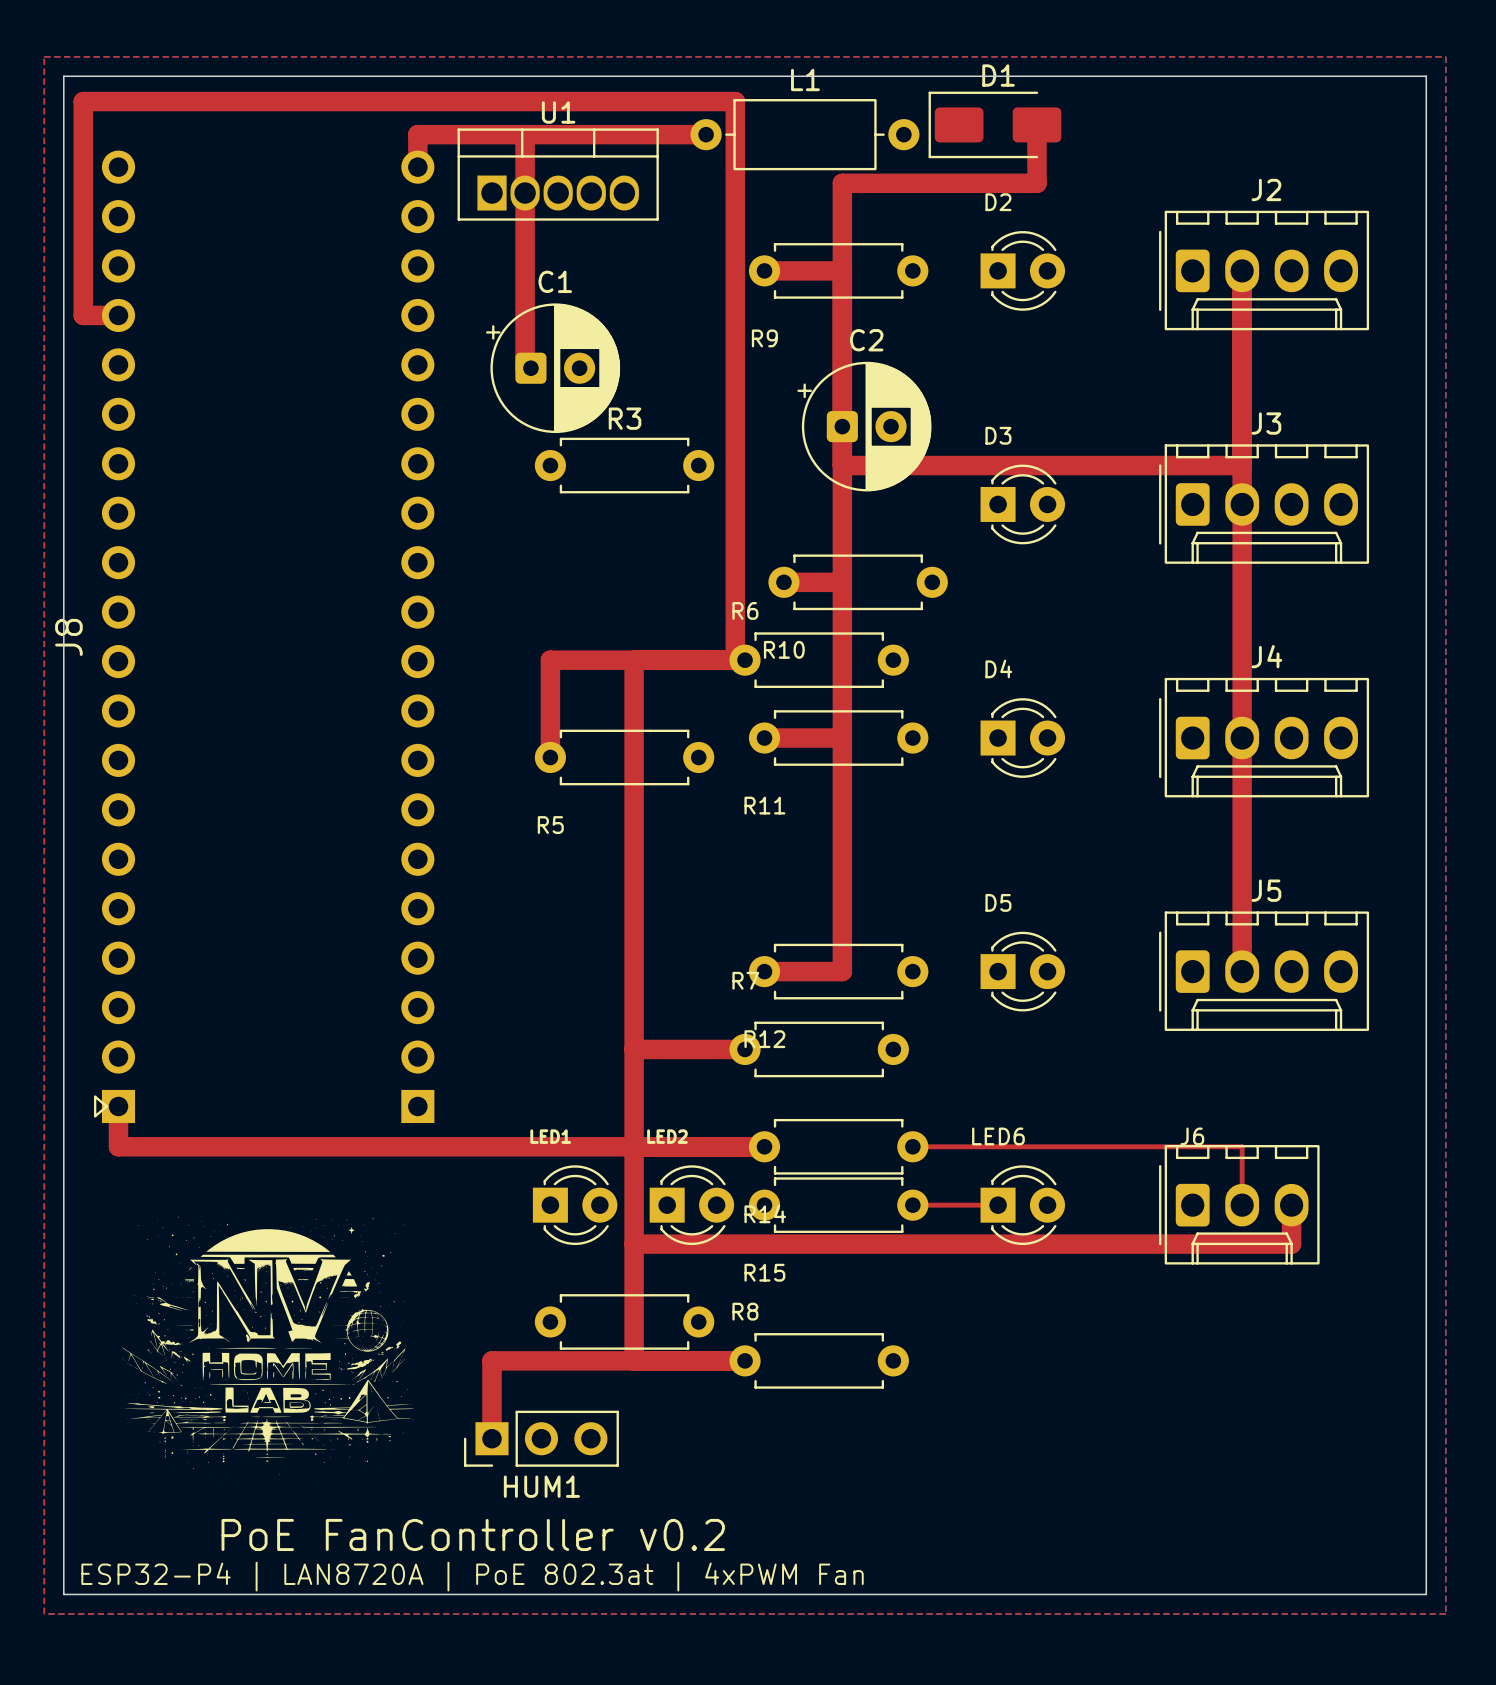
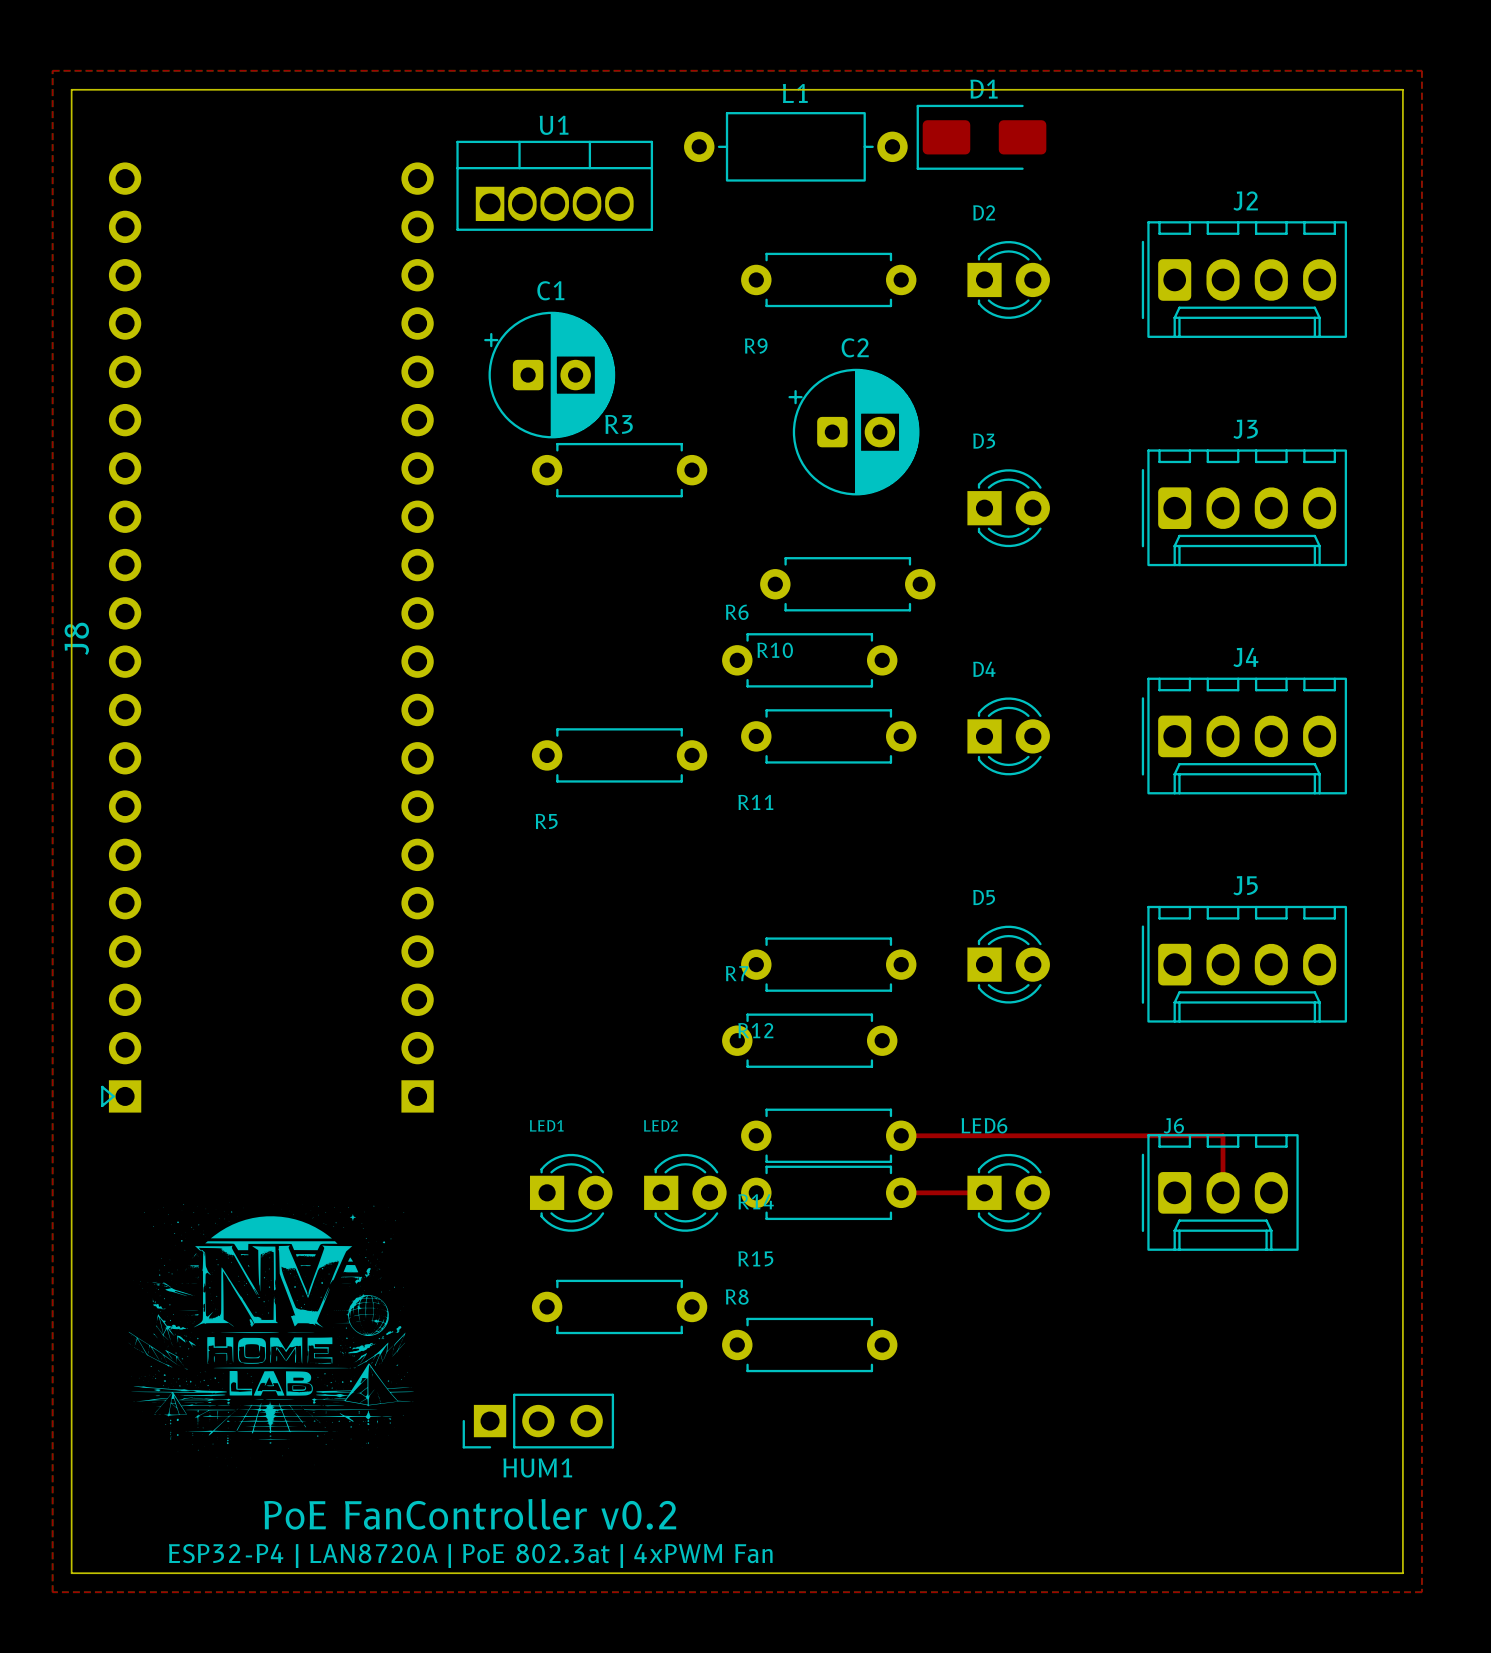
top track: (1037, 124) (1037, 183) (842, 183) (842, 971) (764, 971) -> none
top track: (525, 134) (525, 368) (530, 368) -> none
top track: (706, 134) (417, 134) (417, 167) -> none
top track: (764, 270) (842, 270) -> none
top track: (1242, 270) (1242, 971) -> none
top track: (118, 315) (83, 315) (83, 101) (735, 101) (735, 660) -> none
top track: (842, 465) (1242, 465) -> none
top track: (783, 582) (842, 582) -> none
top track: (634, 660) (634, 1360) -> none
top track: (745, 660) (550, 660) (550, 757) -> none
top track: (764, 738) (842, 738) -> none
top track: (634, 1049) (745, 1049) -> none
top track: (118, 1106) (118, 1146) (764, 1146) -> none
top track: (1291, 1205) (1291, 1244) (634, 1244) -> none
top track: (745, 1360) (492, 1360) (492, 1438) -> none

